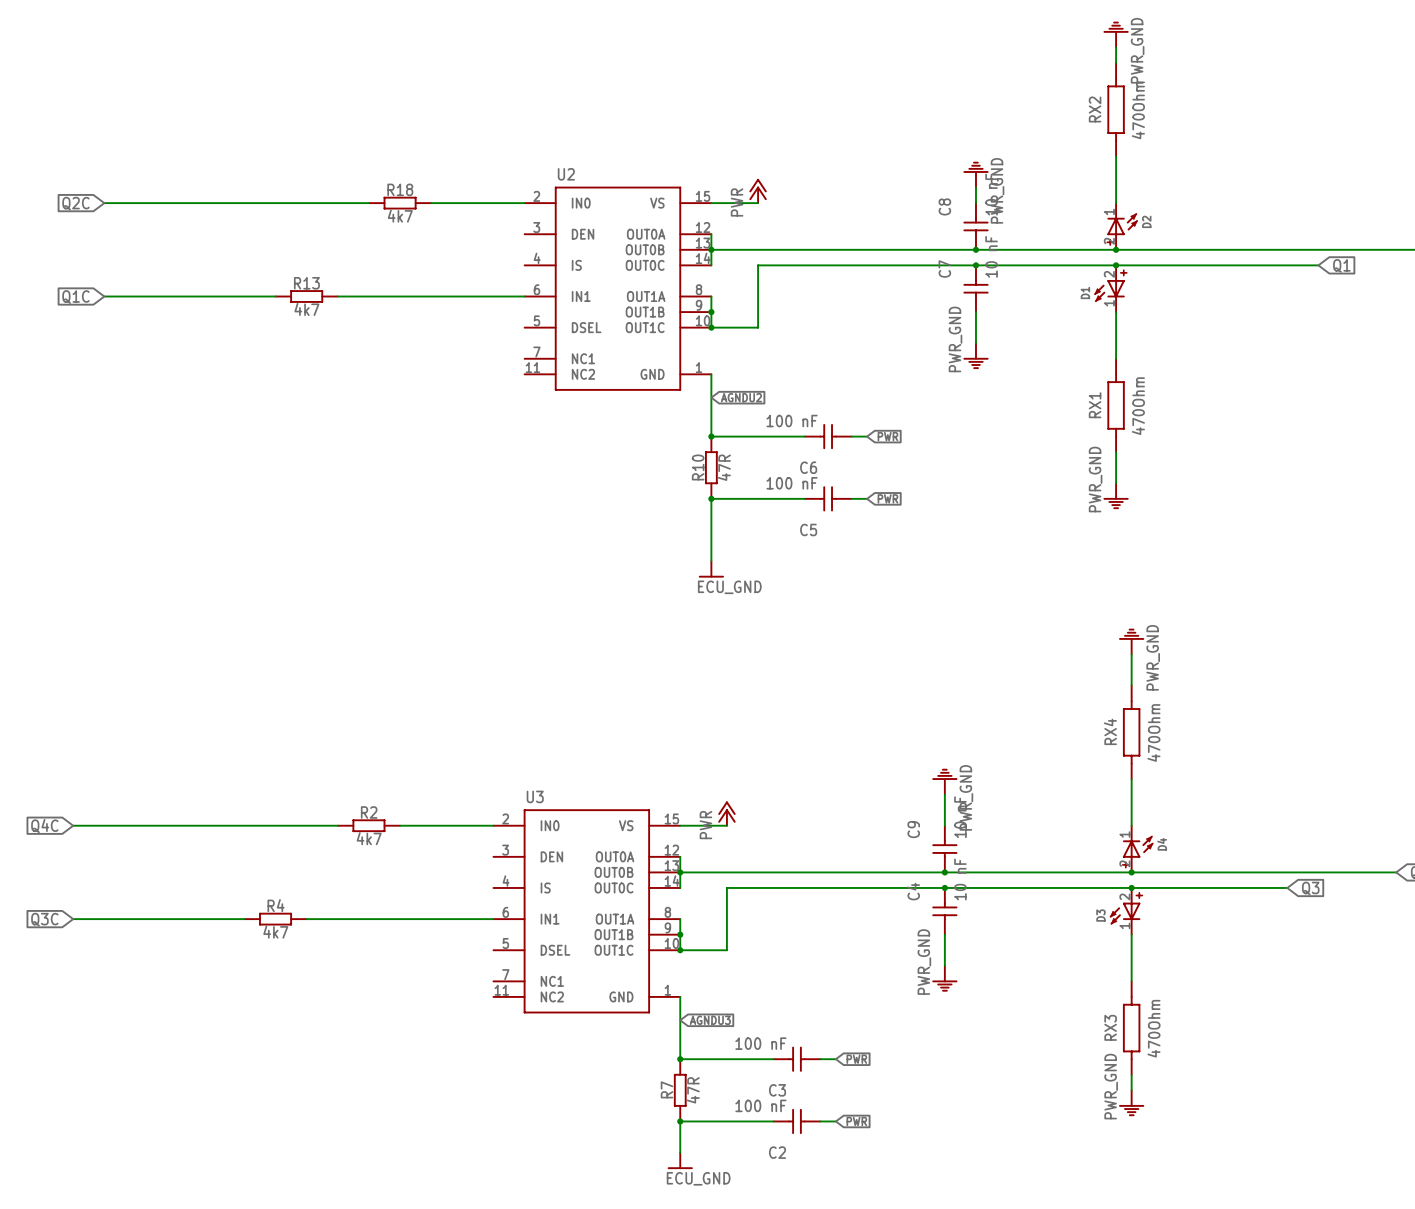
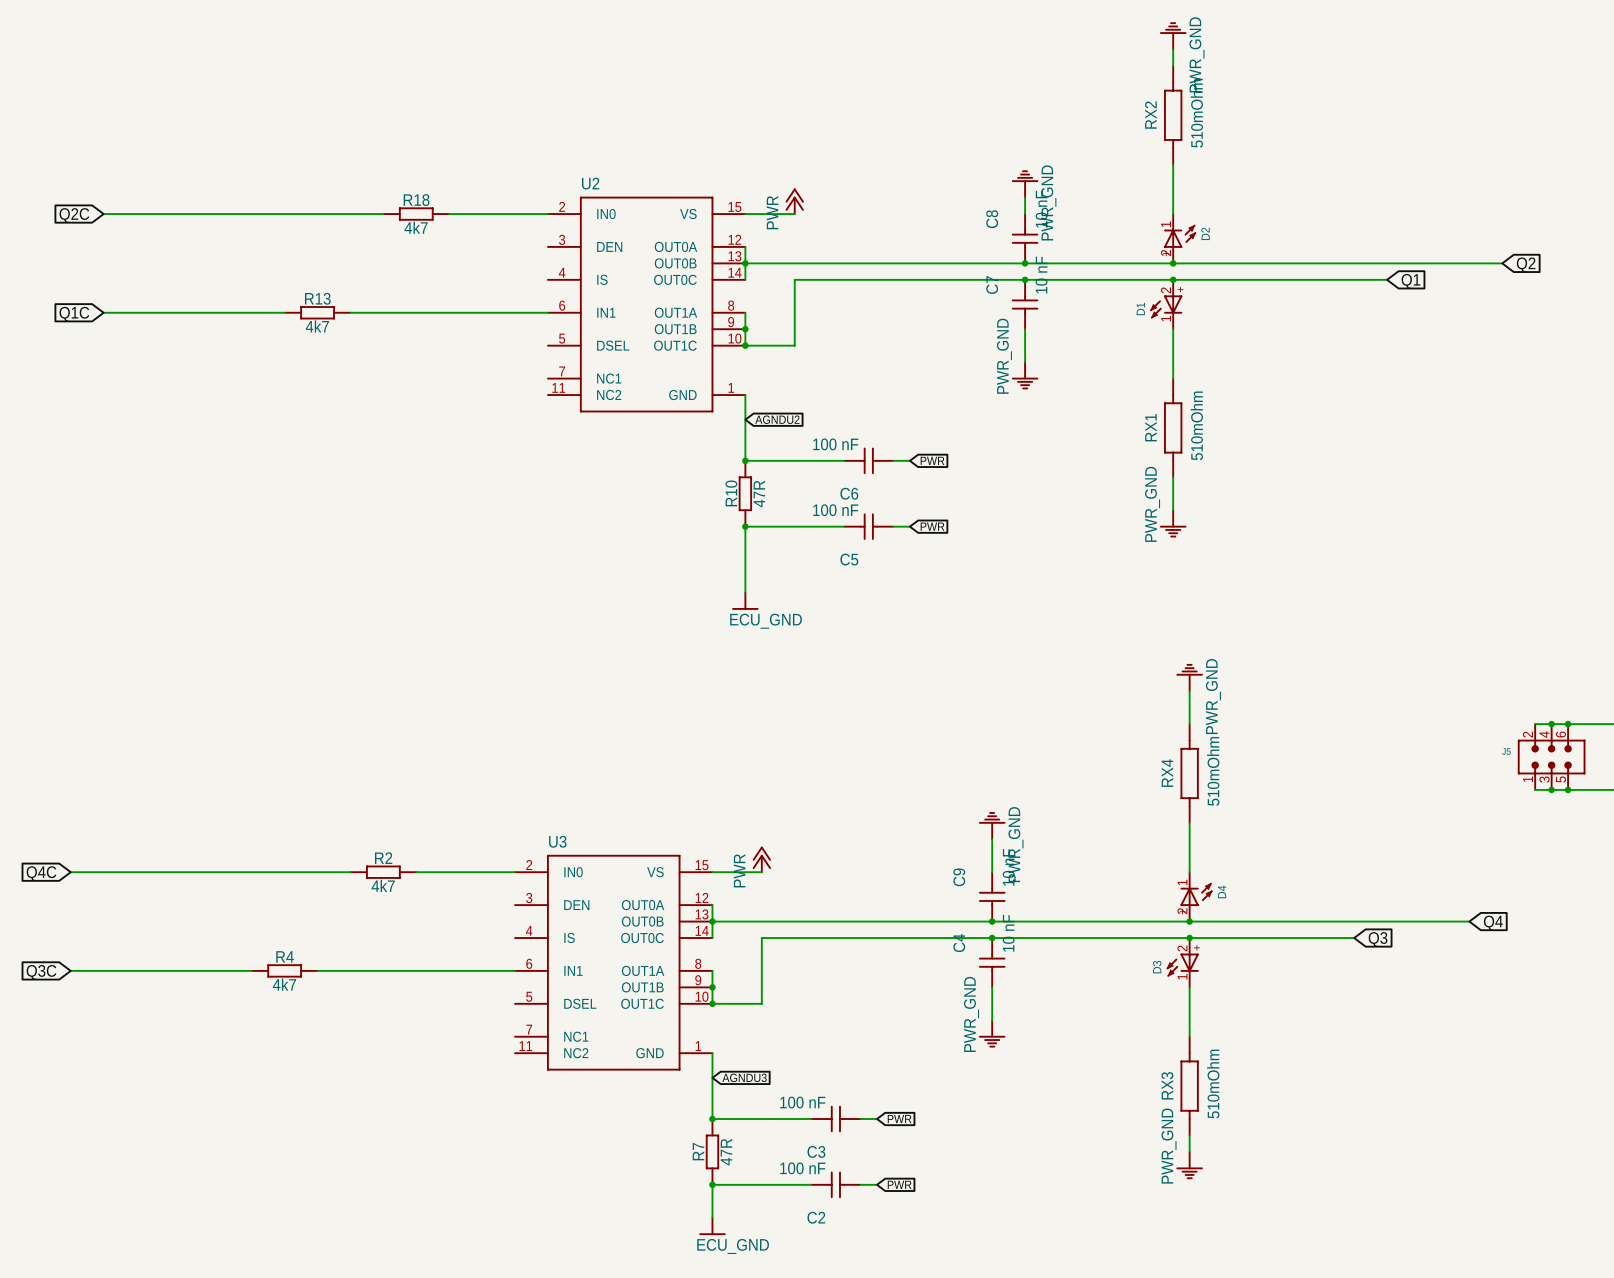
RX2 value: 470Ohm (1138, 110) -> 510mOhm (1196, 113)
RX1 value: 470Ohm (1138, 406) -> 510mOhm (1196, 425)
RX4 value: 470Ohm (1153, 733) -> 510mOhm (1213, 771)
RX3 value: 470Ohm (1153, 1028) -> 510mOhm (1213, 1084)

